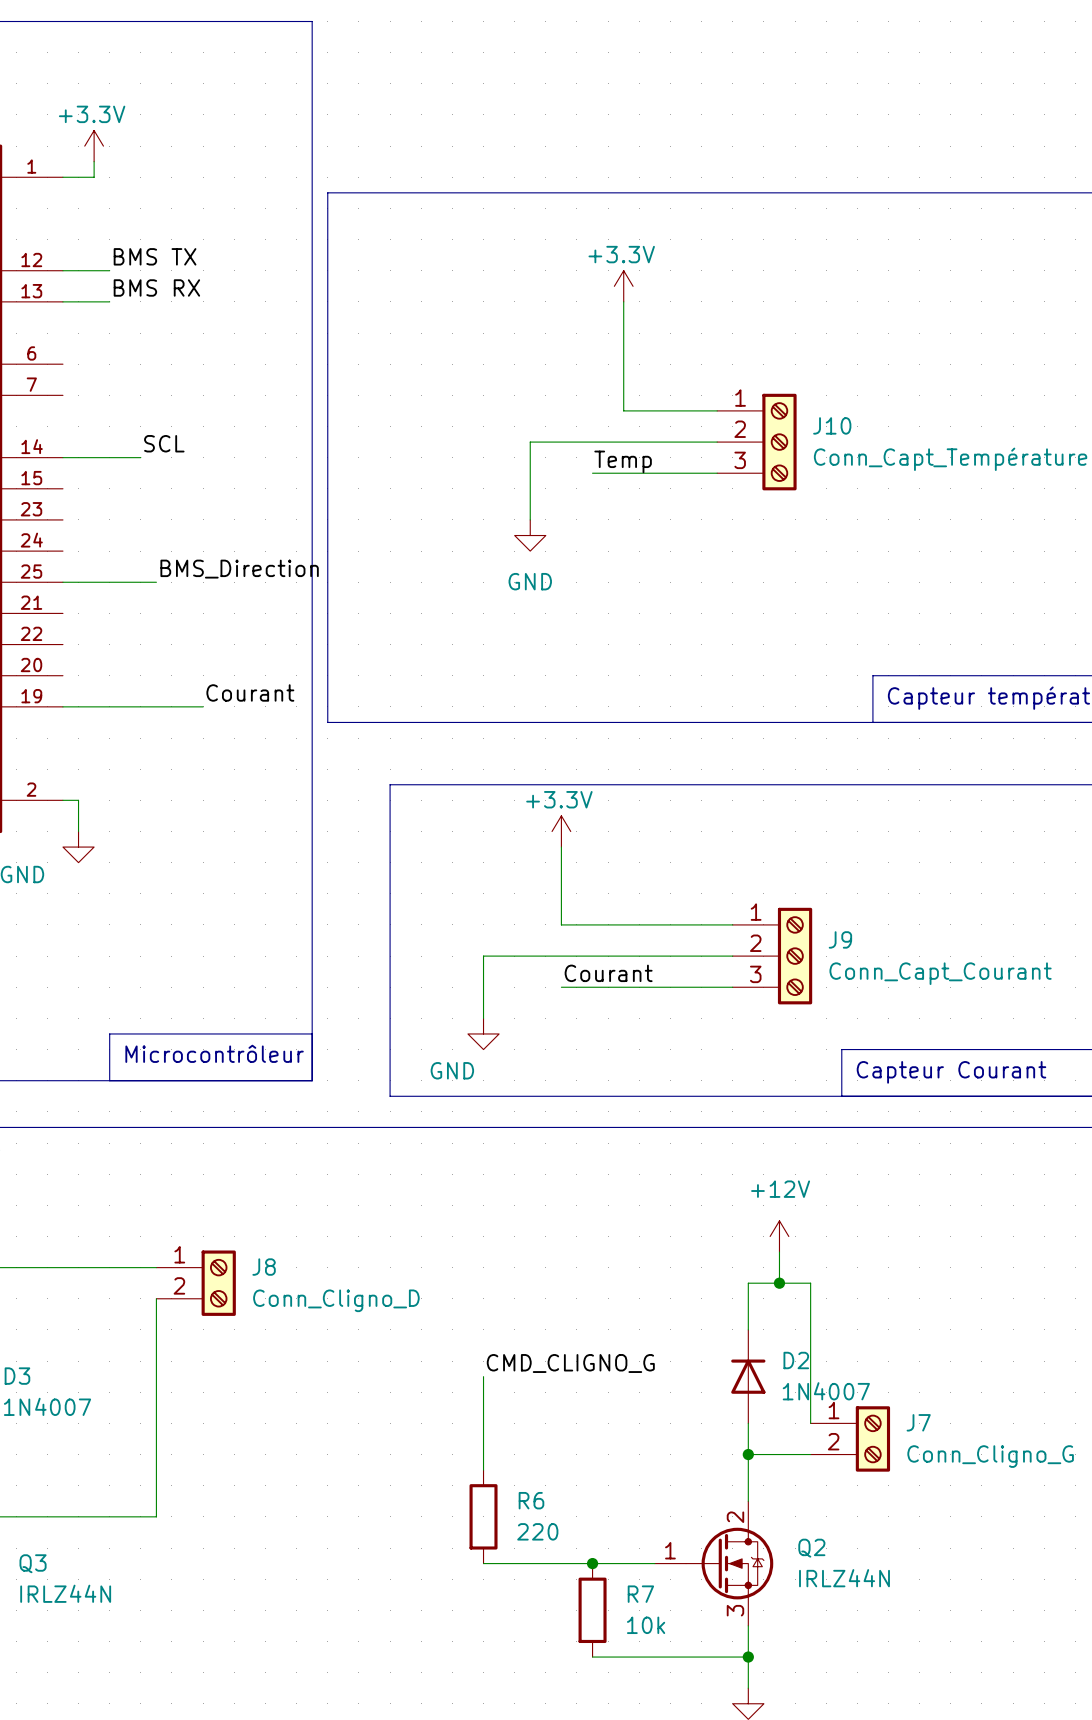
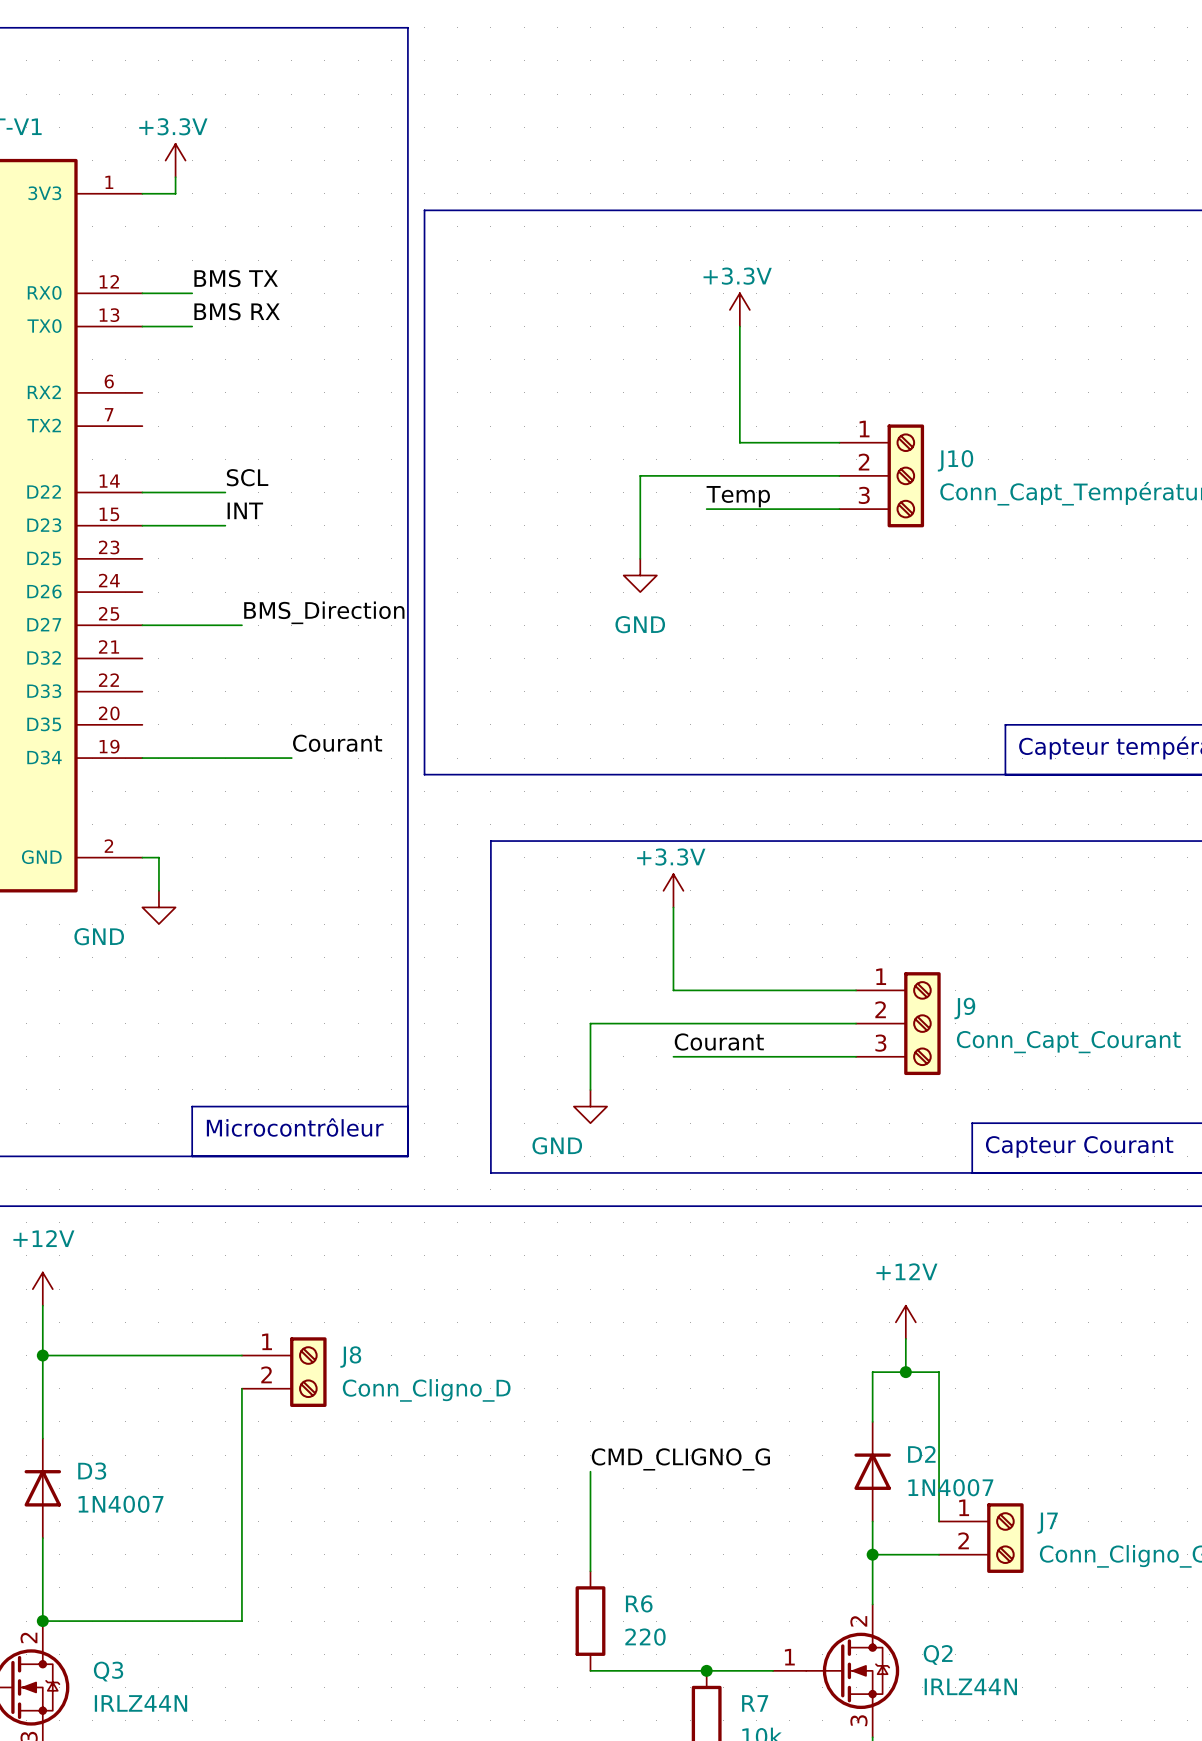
label: none -> INT (245, 510)
wire: none -> (142, 525) (225, 525)

